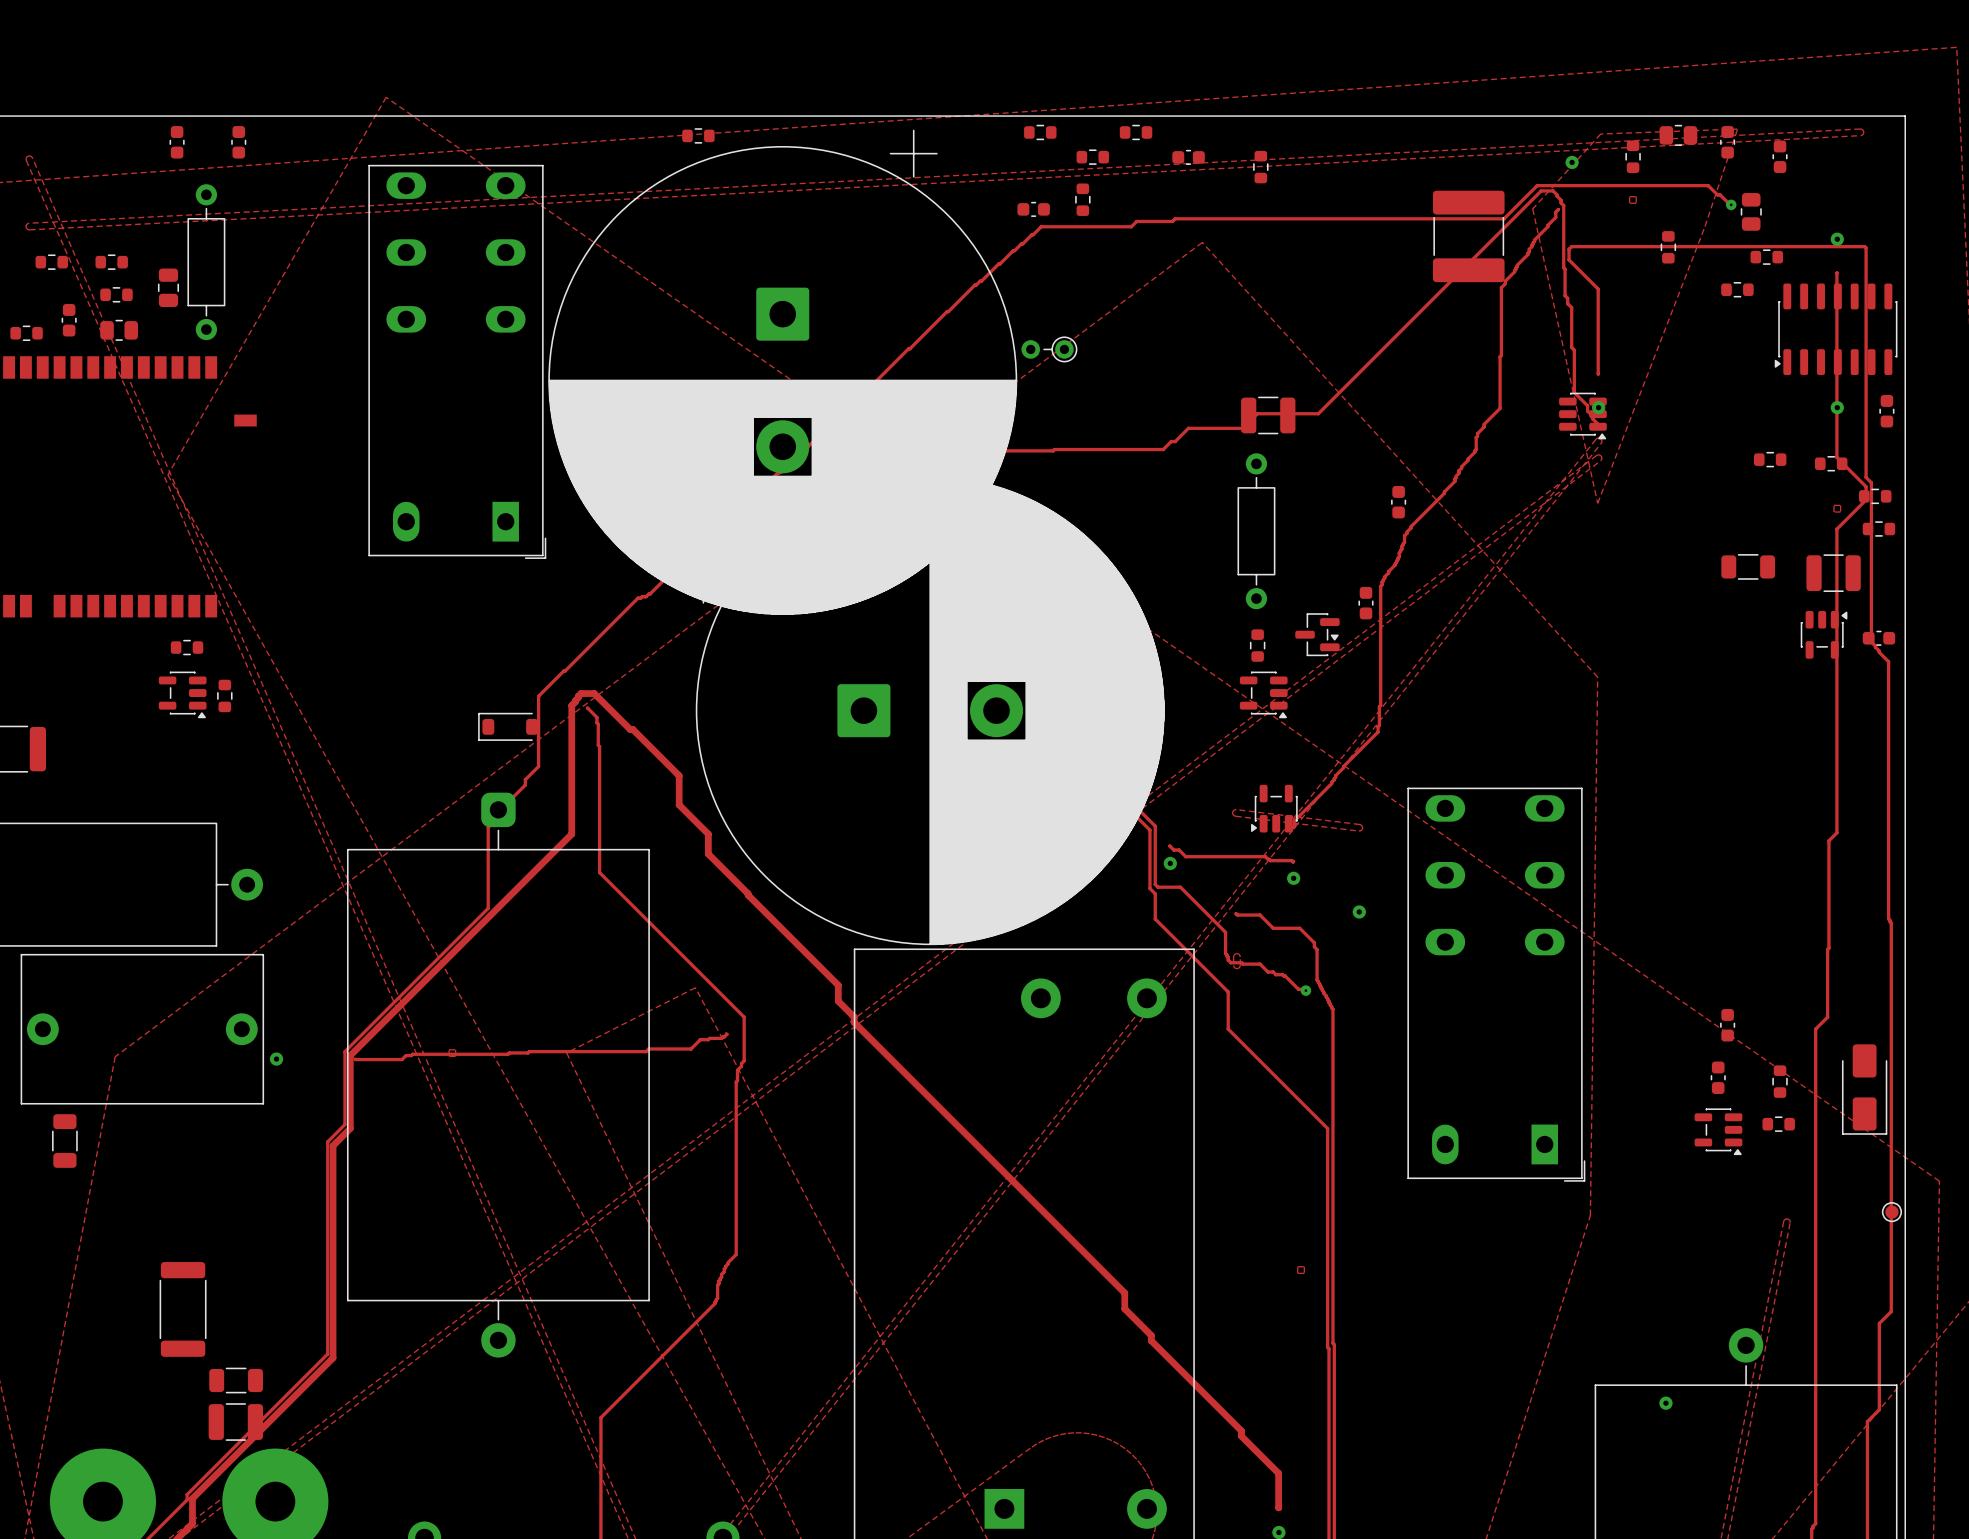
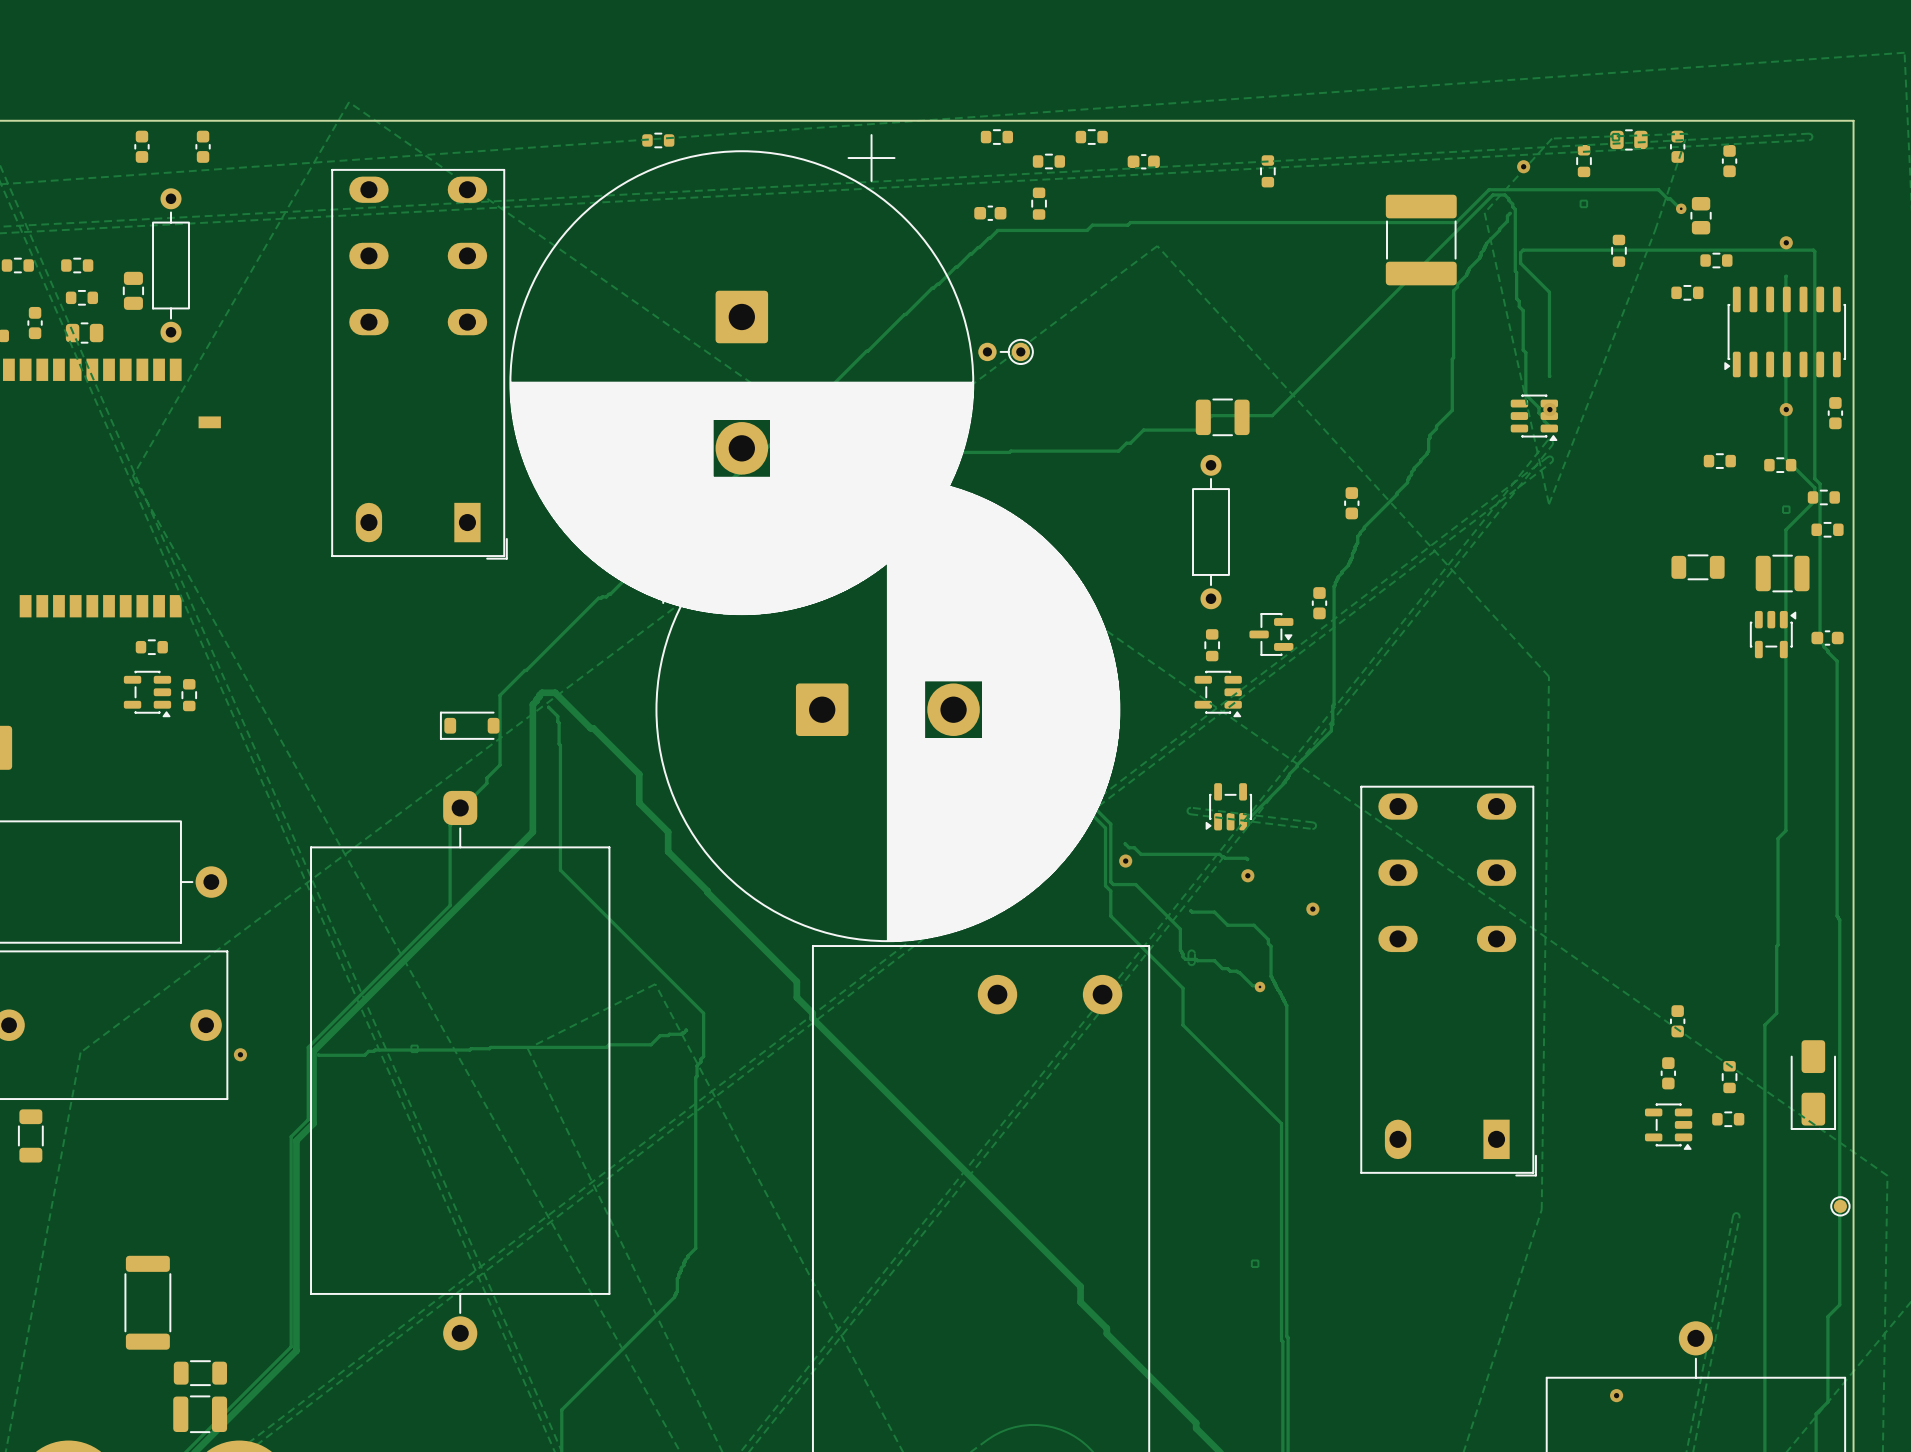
part position: (1260, 167) -> (1267, 171)

